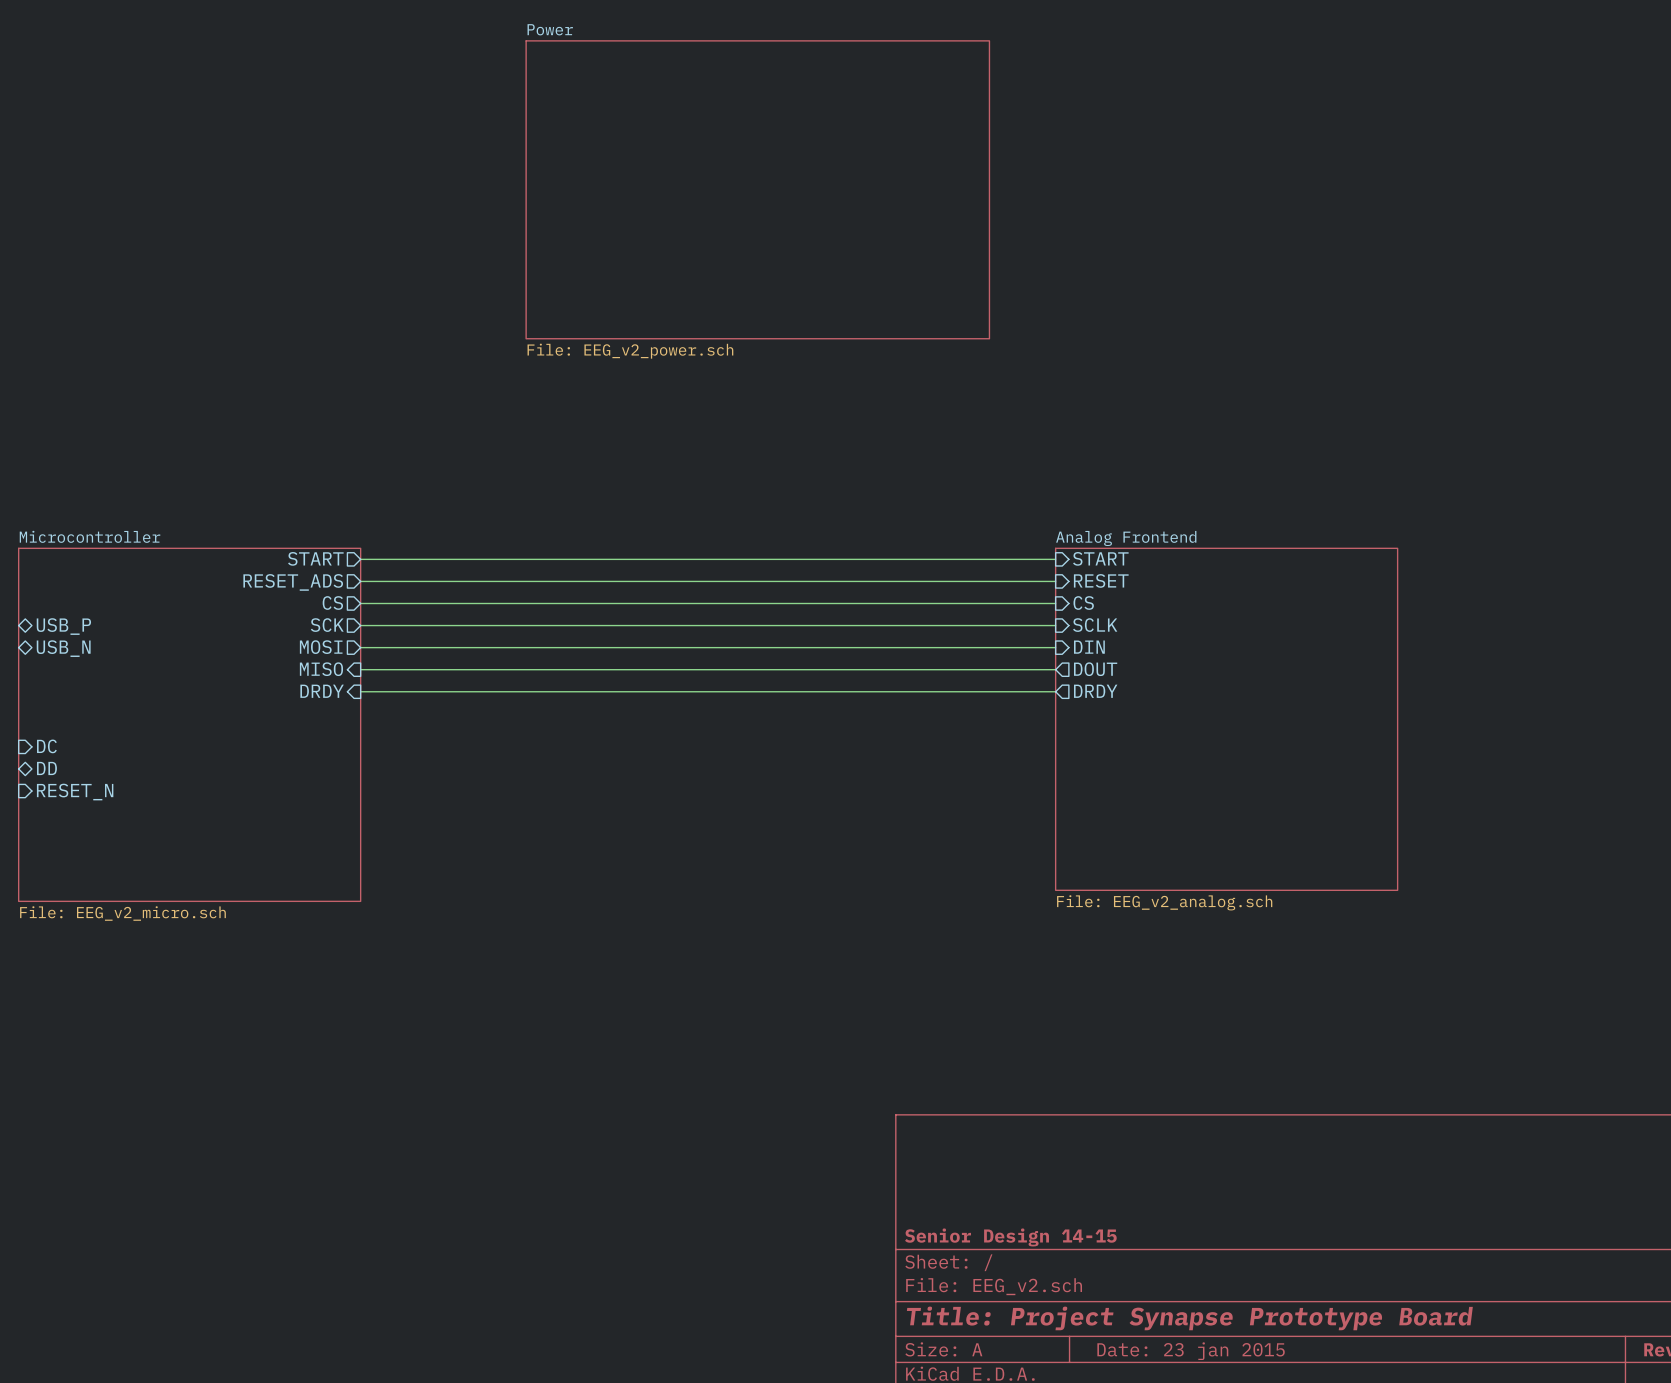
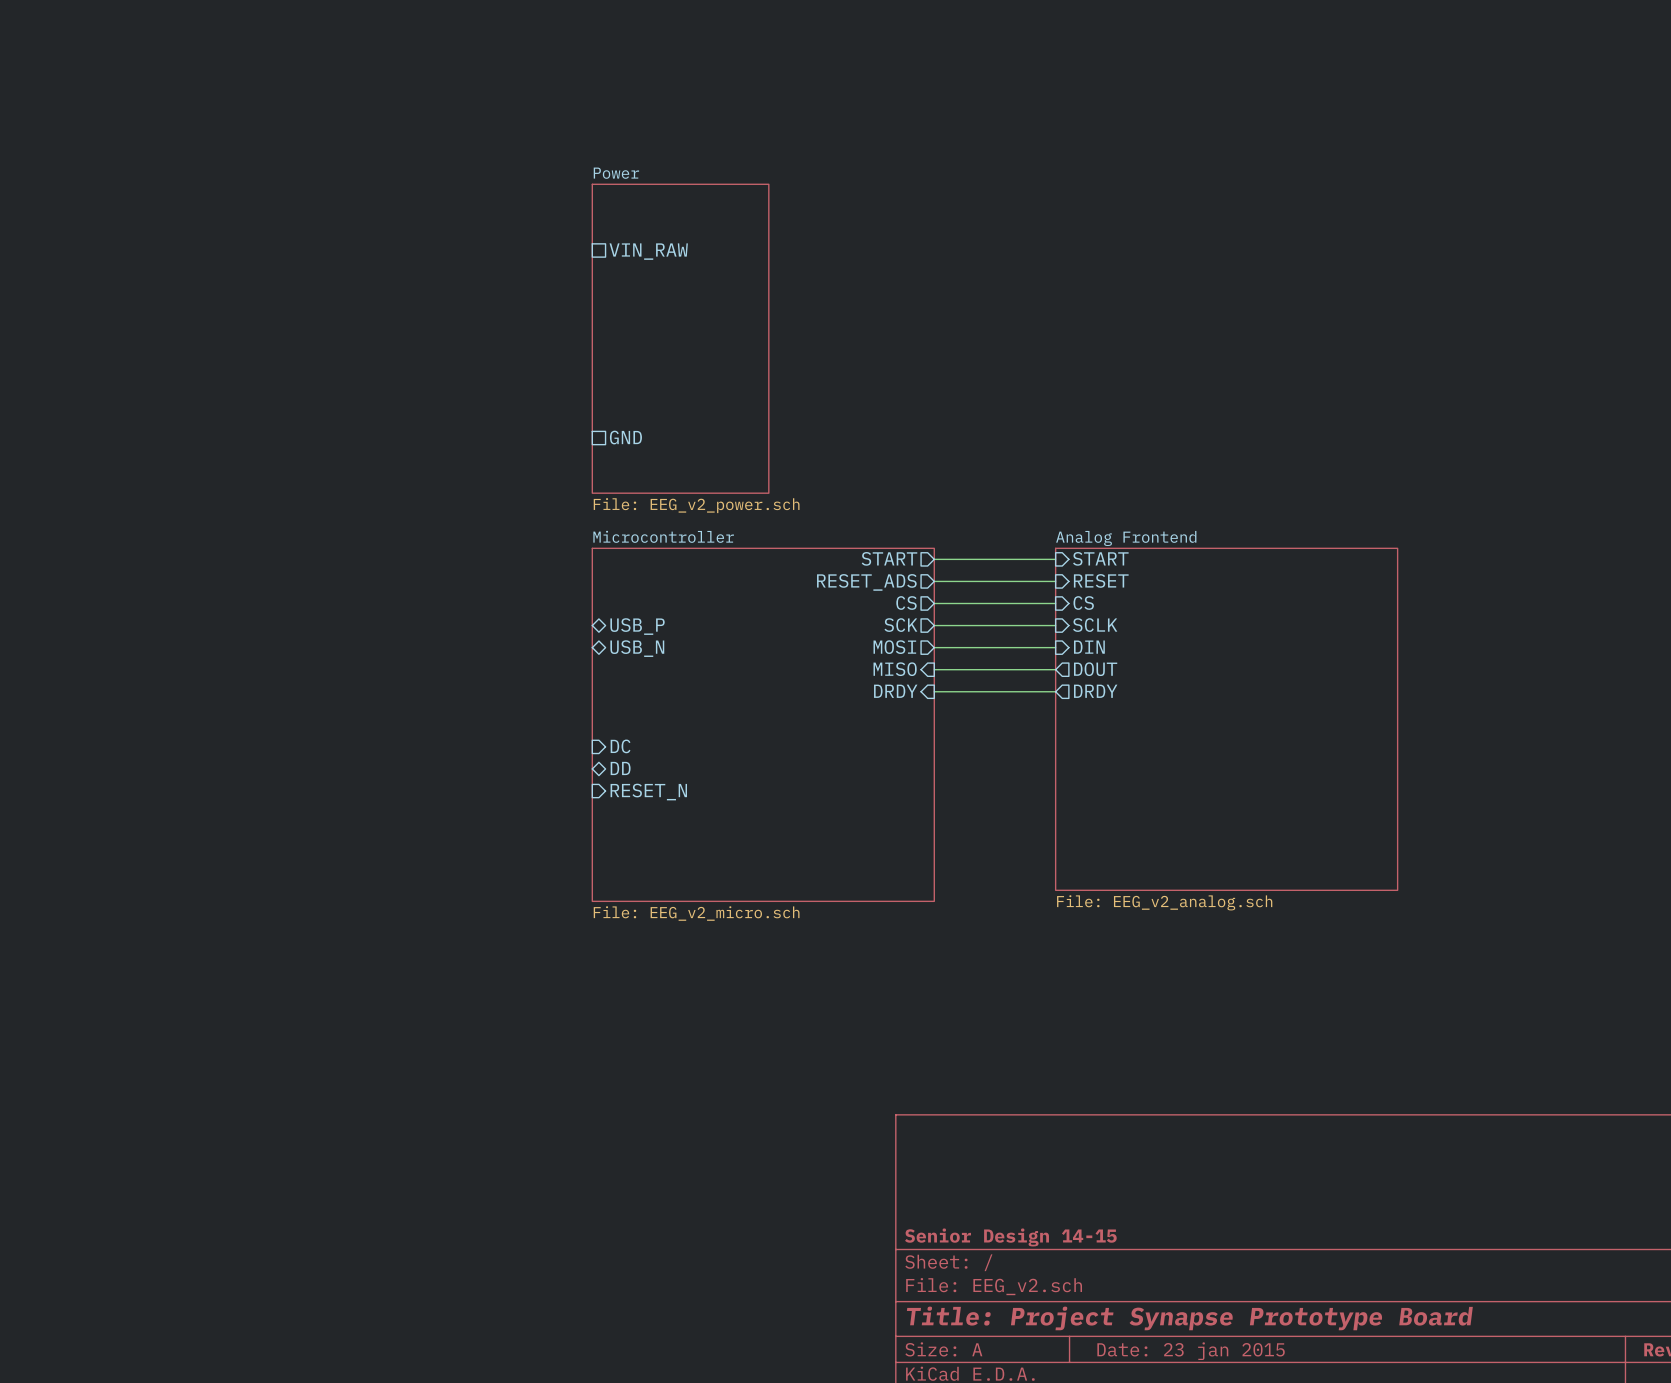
sheet Power: File: EEG_v2_power.sch (757, 189) -> none
sheet pin: none -> VIN_RAW (648, 251)
sheet Power: none -> File: EEG_v2_power.sch (680, 338)
sheet pin: none -> GND (625, 437)
sheet pin: START (315, 558) -> none
sheet pin: none -> START (889, 558)
wire: (360, 559) (934, 559) -> none
wire: (360, 581) (934, 581) -> none
sheet pin: RESET_ADS (293, 582) -> none
sheet pin: none -> RESET_ADS (866, 582)
sheet pin: CS (332, 603) -> none
wire: (360, 603) (934, 603) -> none
sheet pin: none -> CS (906, 603)
sheet pin: SCK (327, 625) -> none
wire: (360, 625) (934, 625) -> none
sheet pin: none -> SCK (900, 625)
sheet pin: USB_P (63, 626) -> none
sheet pin: none -> USB_P (637, 626)
sheet pin: MOSI (321, 647) -> none
wire: (360, 647) (934, 647) -> none
sheet pin: none -> MOSI (894, 647)
sheet pin: USB_N (63, 648) -> none
sheet pin: none -> USB_N (637, 648)
sheet pin: MISO (321, 669) -> none
wire: (360, 669) (934, 669) -> none
sheet pin: none -> MISO (895, 669)
sheet pin: DRDY (322, 691) -> none
wire: (360, 691) (934, 691) -> none
sheet pin: none -> DRDY (895, 691)
sheet Microcontroller: File: EEG_v2_micro.sch (189, 724) -> none
sheet Microcontroller: none -> File: EEG_v2_micro.sch (763, 724)
sheet pin: DC (46, 746) -> none
sheet pin: none -> DC (620, 746)
sheet pin: DD (46, 768) -> none
sheet pin: none -> DD (620, 768)
sheet pin: RESET_N (75, 792) -> none
sheet pin: none -> RESET_N (648, 792)

